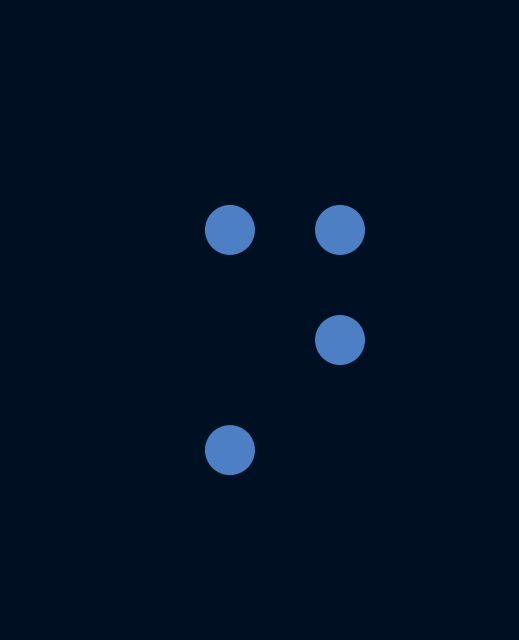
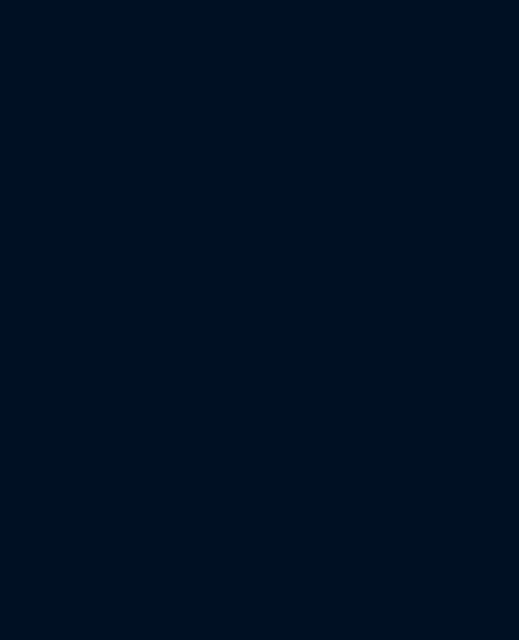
part: (229, 229) -> none
part: (340, 229) -> none
part: (340, 340) -> none
part: (229, 450) -> none

